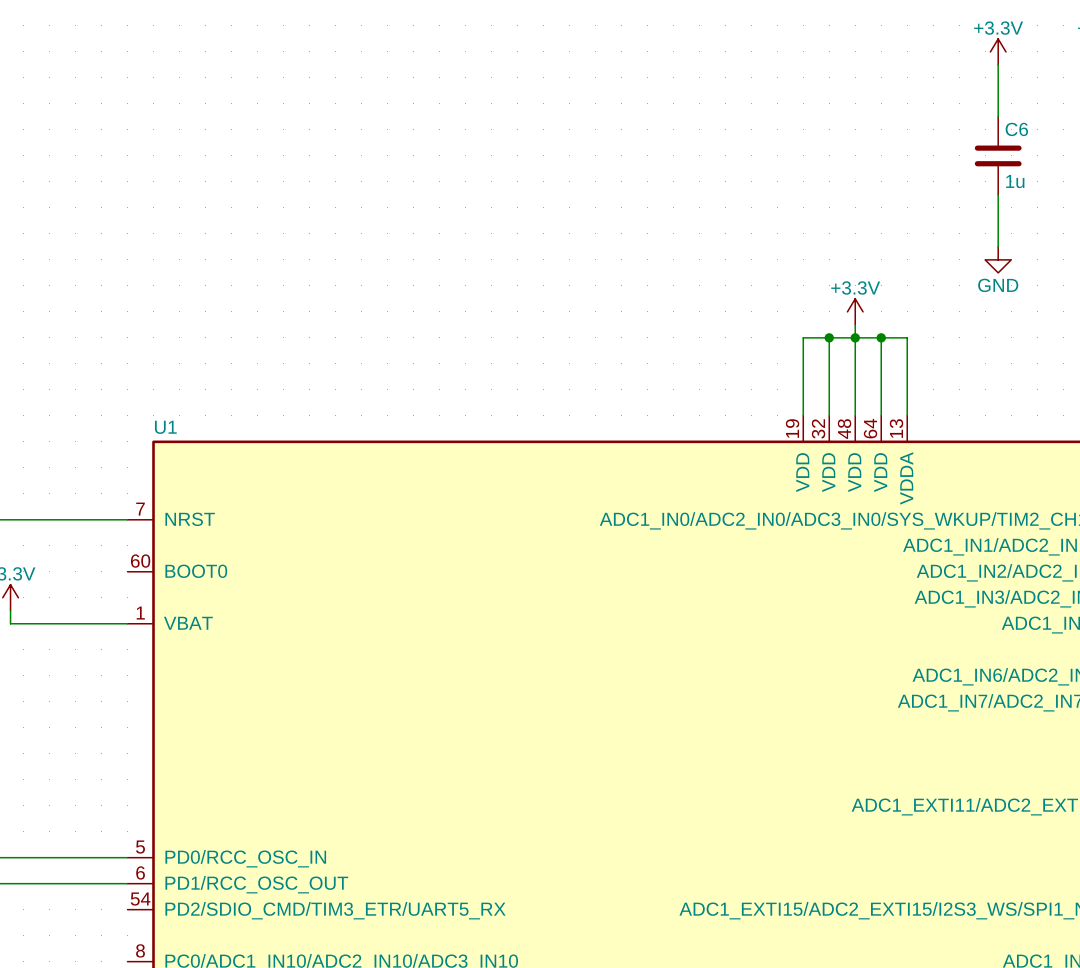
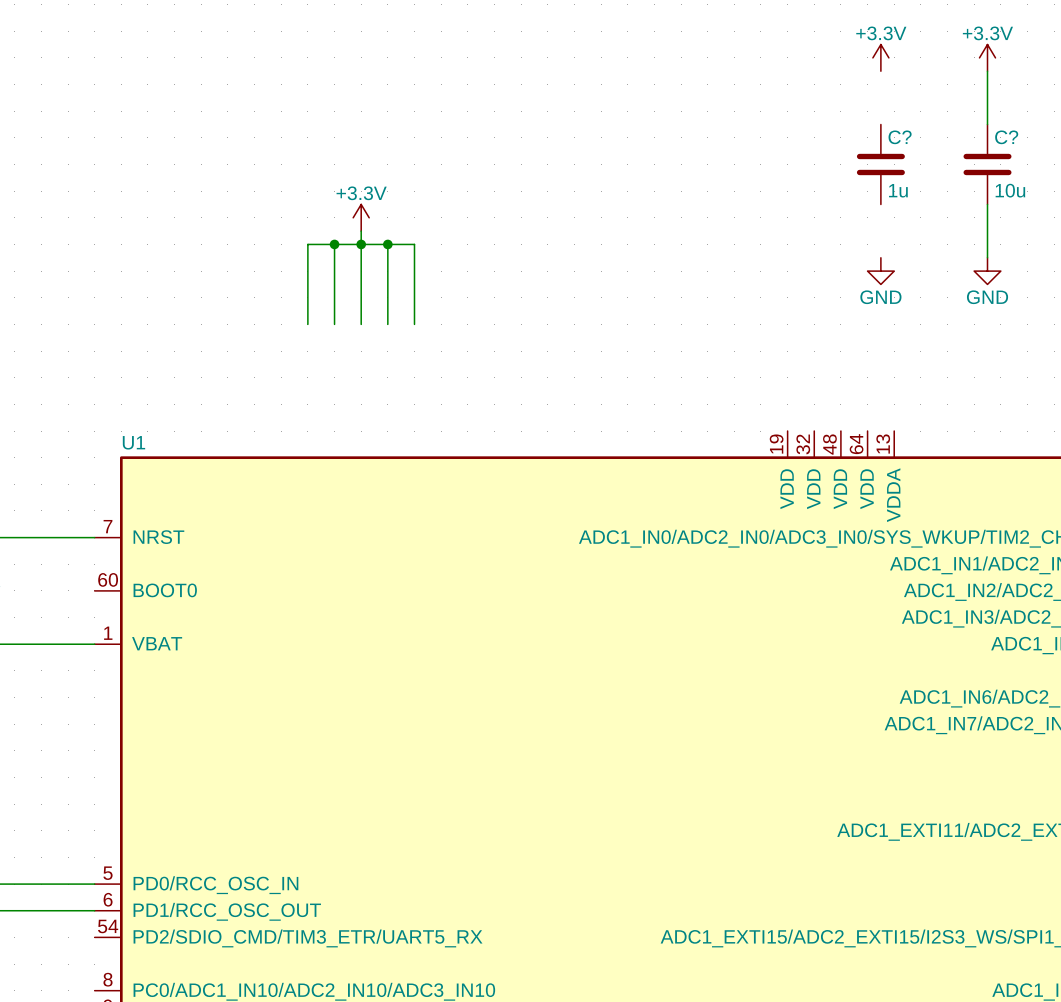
power symbol: none -> +3.3V (880, 57)
C6 name: C6 (1016, 129) -> C? (1006, 137)
C?: none -> 1u (880, 164)
C6 value: 1u (1015, 181) -> 10u (1010, 190)
power symbol: none -> +3.3V (361, 217)
wire: none -> (361, 231) (361, 324)
wire: none -> (334, 244) (334, 324)
junction: none -> (334, 244)
junction: none -> (361, 244)
wire: none -> (387, 244) (387, 324)
junction: none -> (387, 244)
power symbol: none -> GND (880, 271)
wire: none -> (307, 324) (307, 244) (414, 244) (414, 324)
power symbol: +3.3V (855, 311) -> none
wire: (855, 324) (855, 415) -> none
wire: (829, 337) (829, 415) -> none
junction: (829, 337) -> none
junction: (855, 337) -> none
wire: (881, 337) (881, 415) -> none
junction: (881, 337) -> none
wire: (803, 415) (803, 337) (907, 337) (907, 415) -> none

